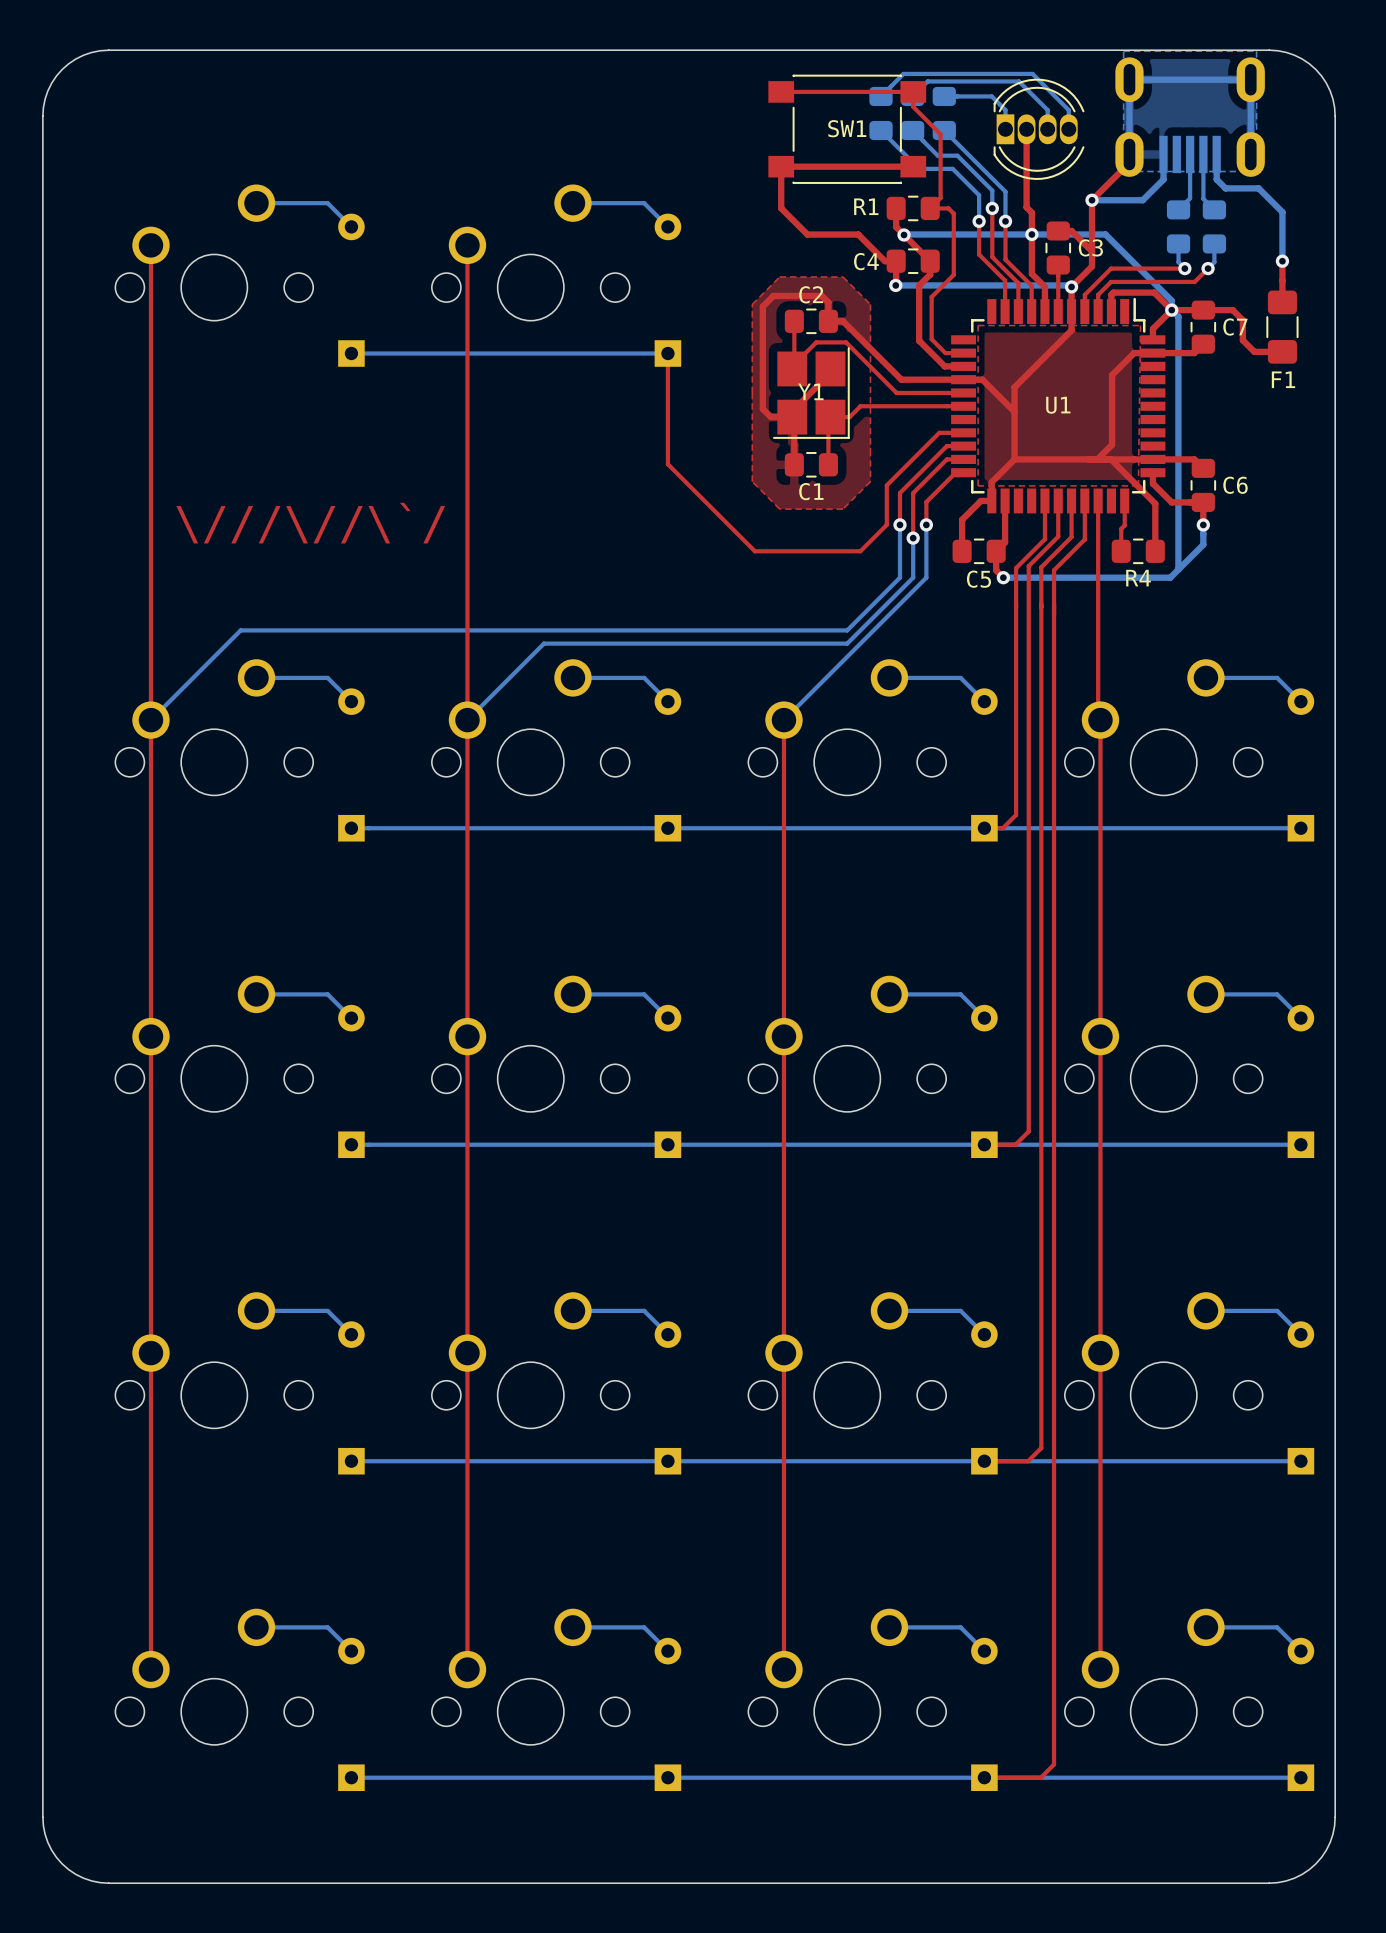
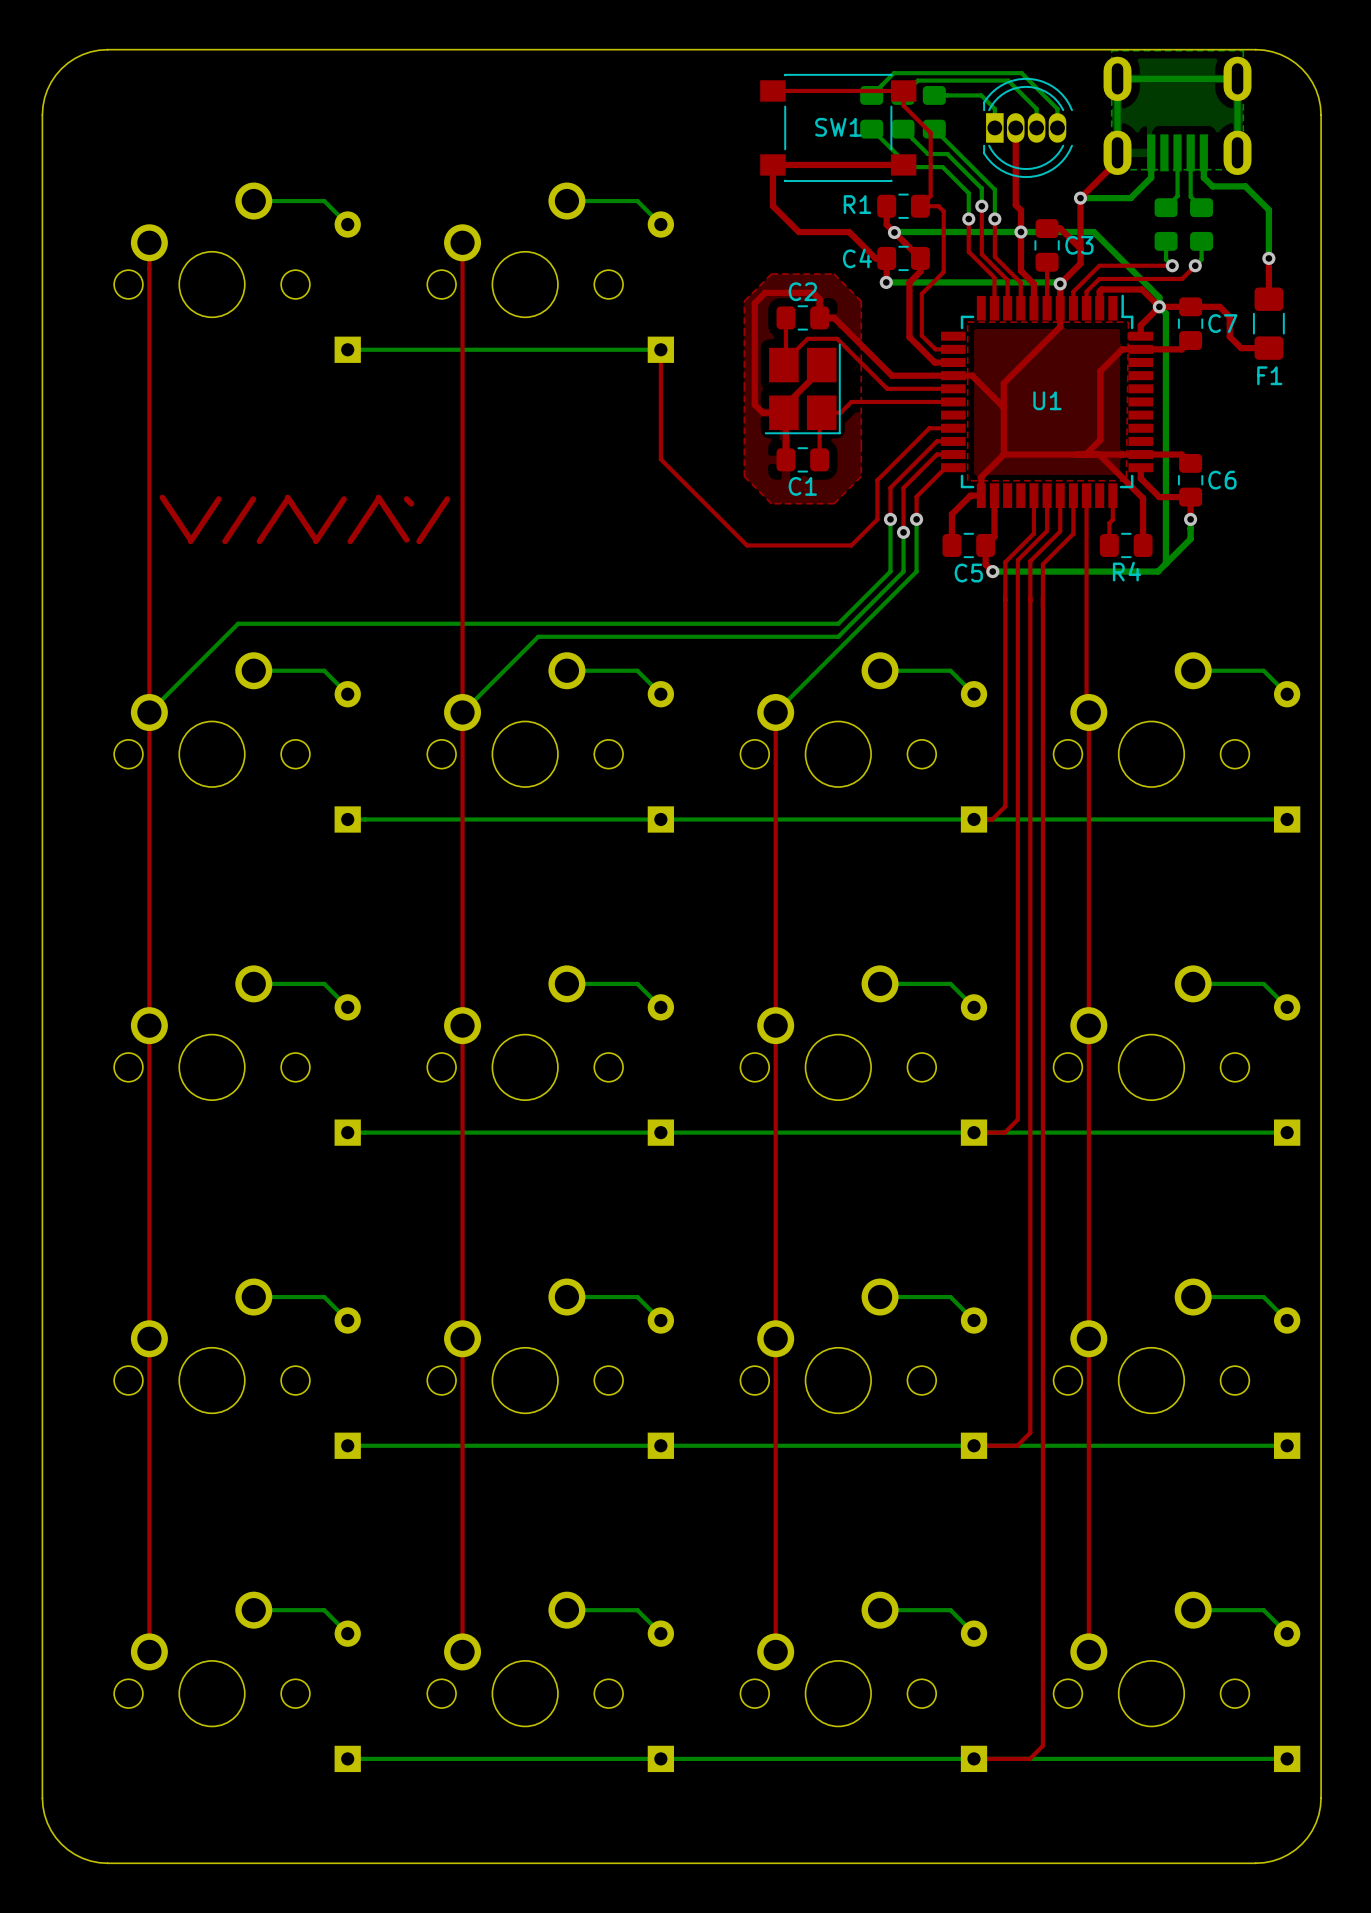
Y1 name: Y1 (810, 391) -> none

